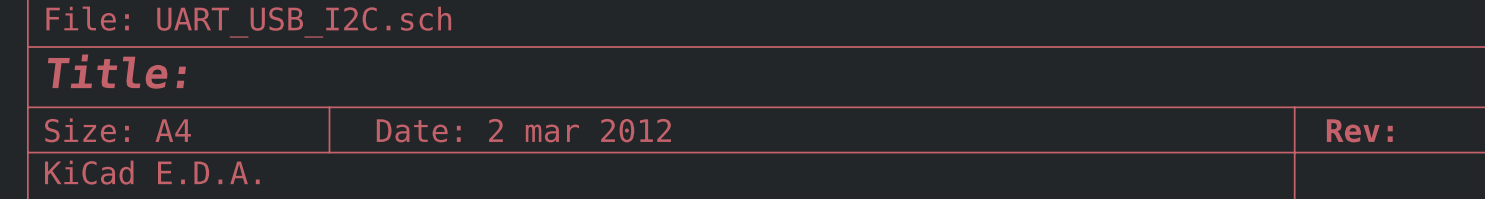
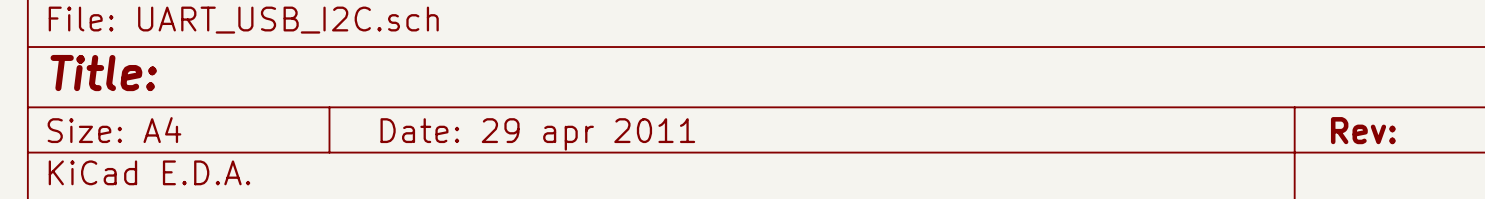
title block: Date: 2 mar 2012 (523, 130) -> Date: 29 apr 2011 (537, 134)

